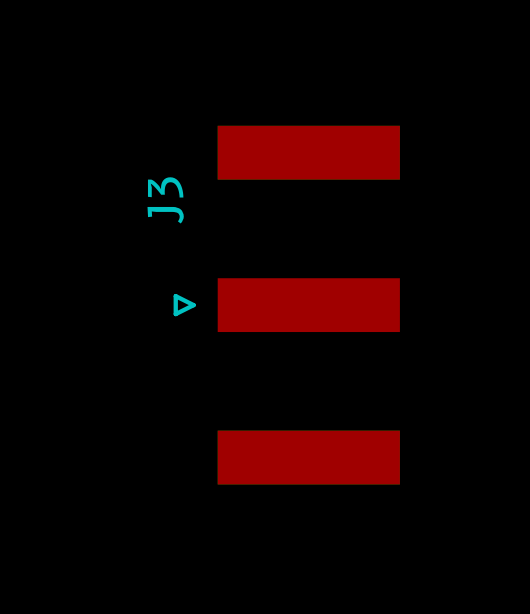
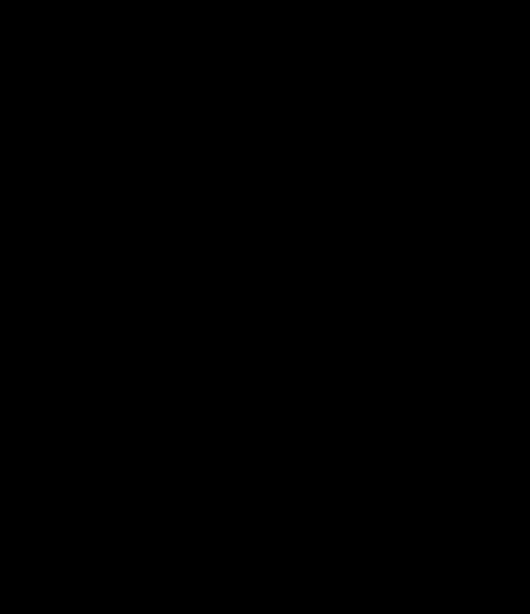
J3: (286, 305) -> none

